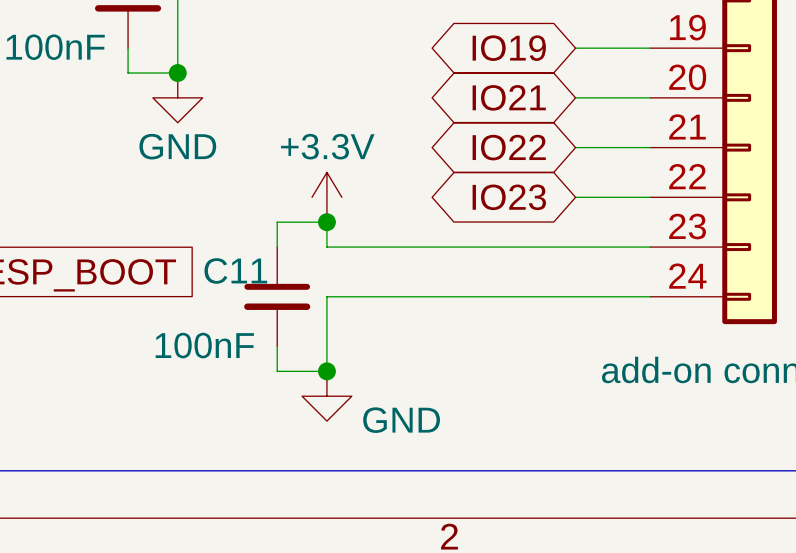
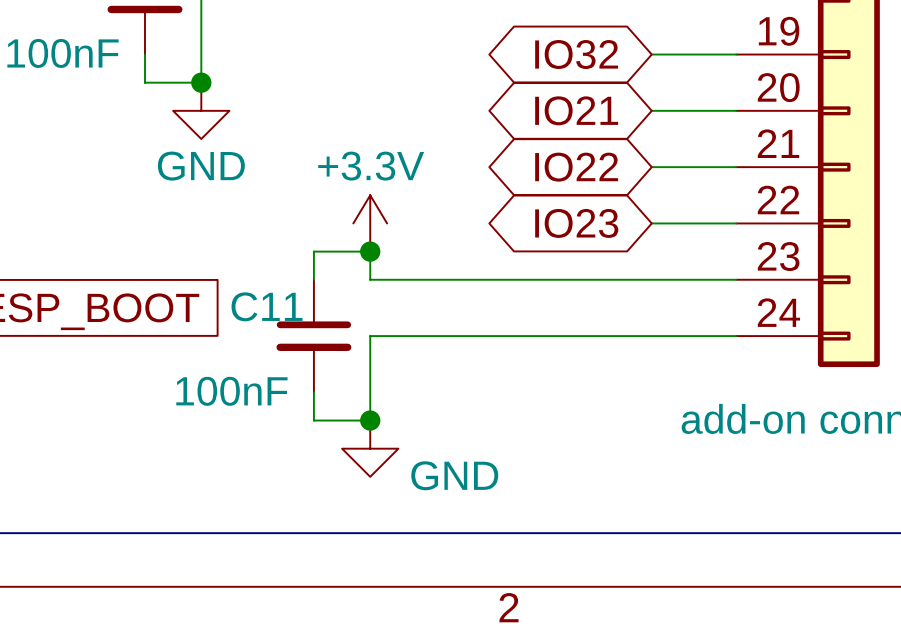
global label: IO19 (509, 48) -> IO32 (576, 54)

